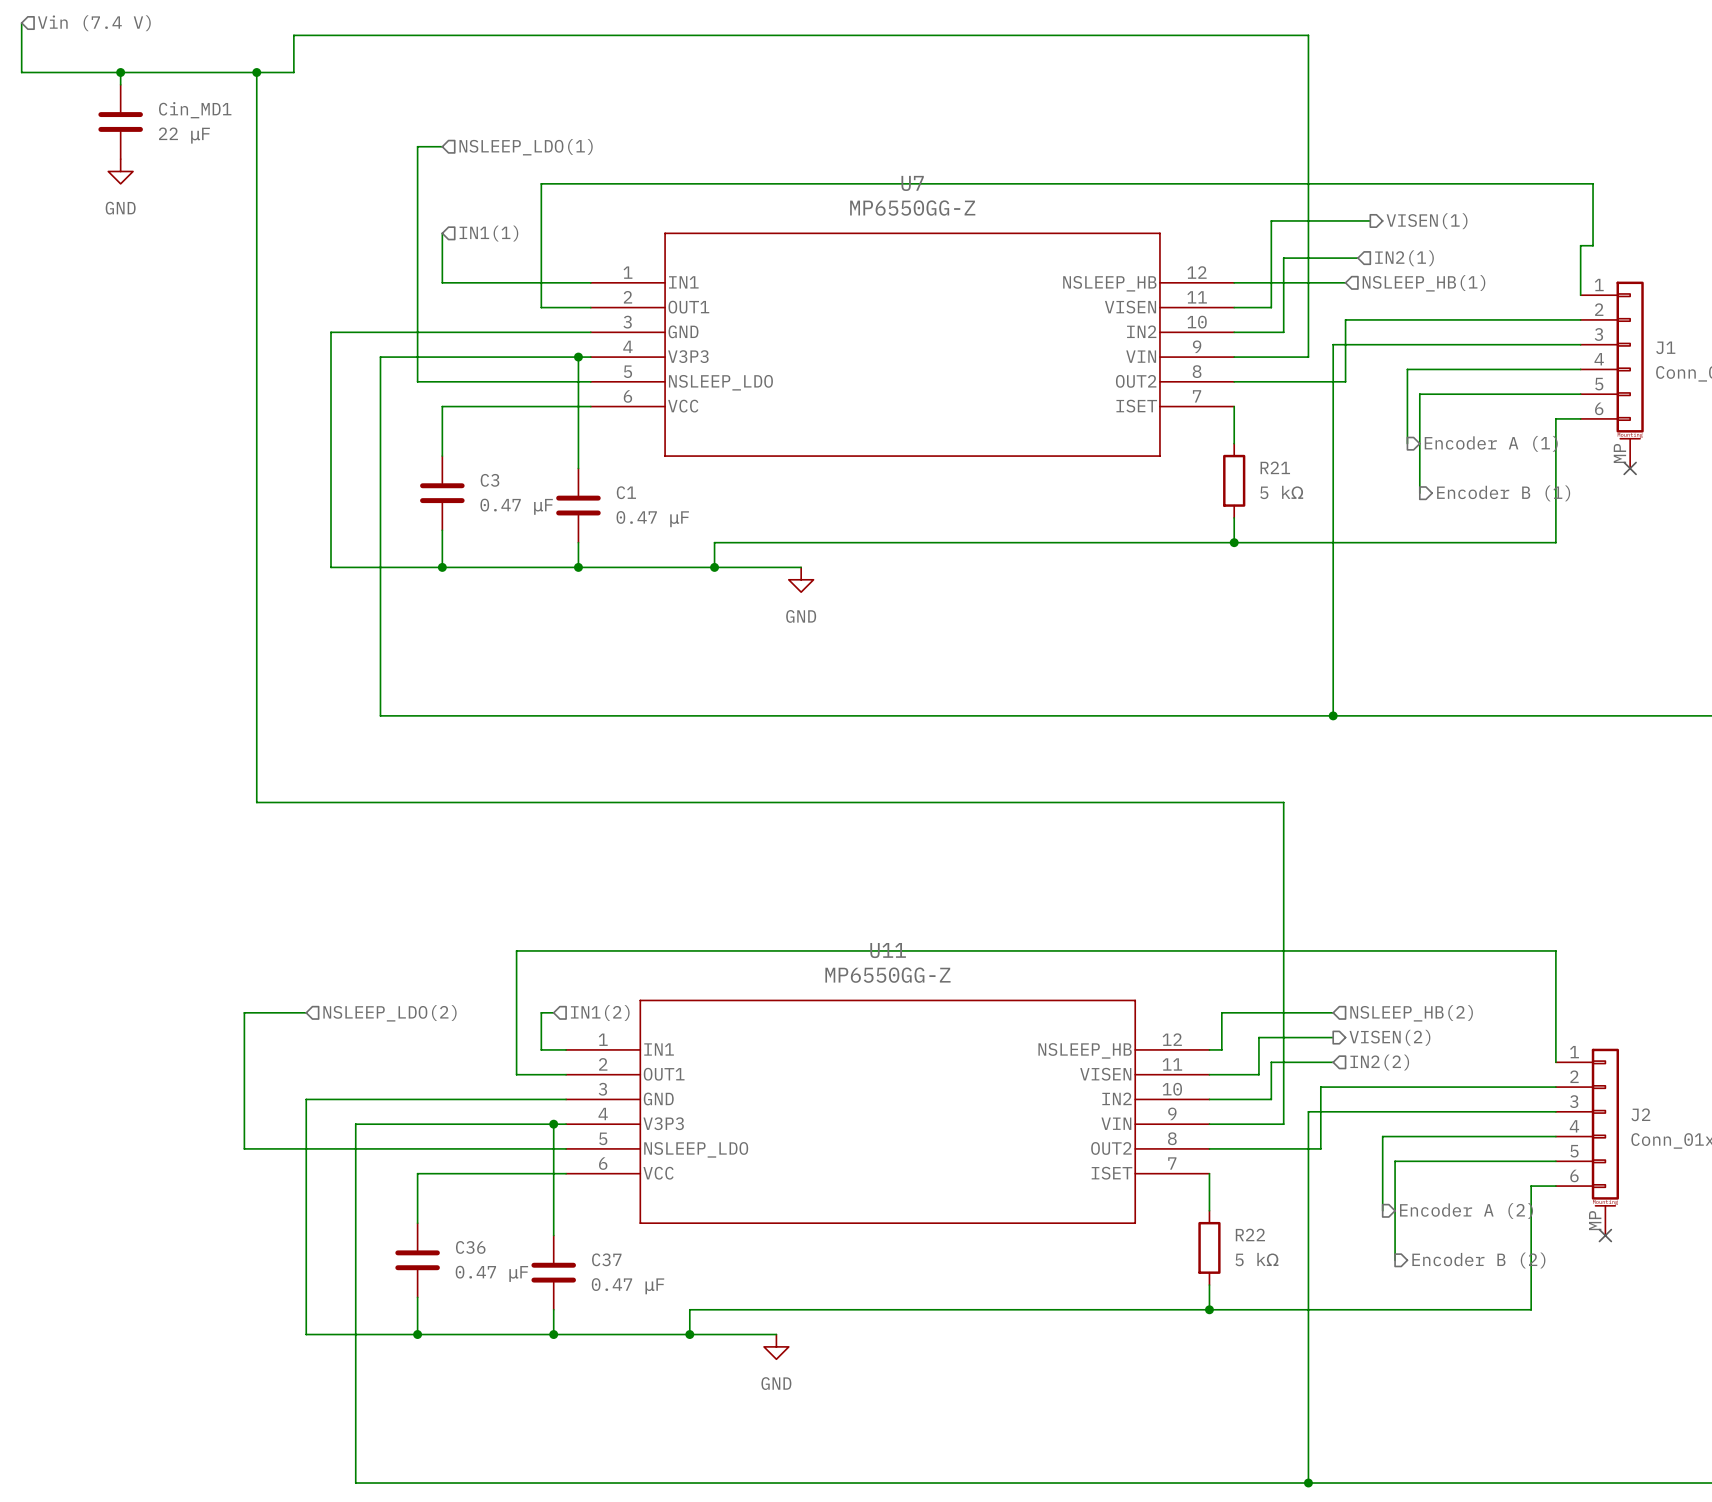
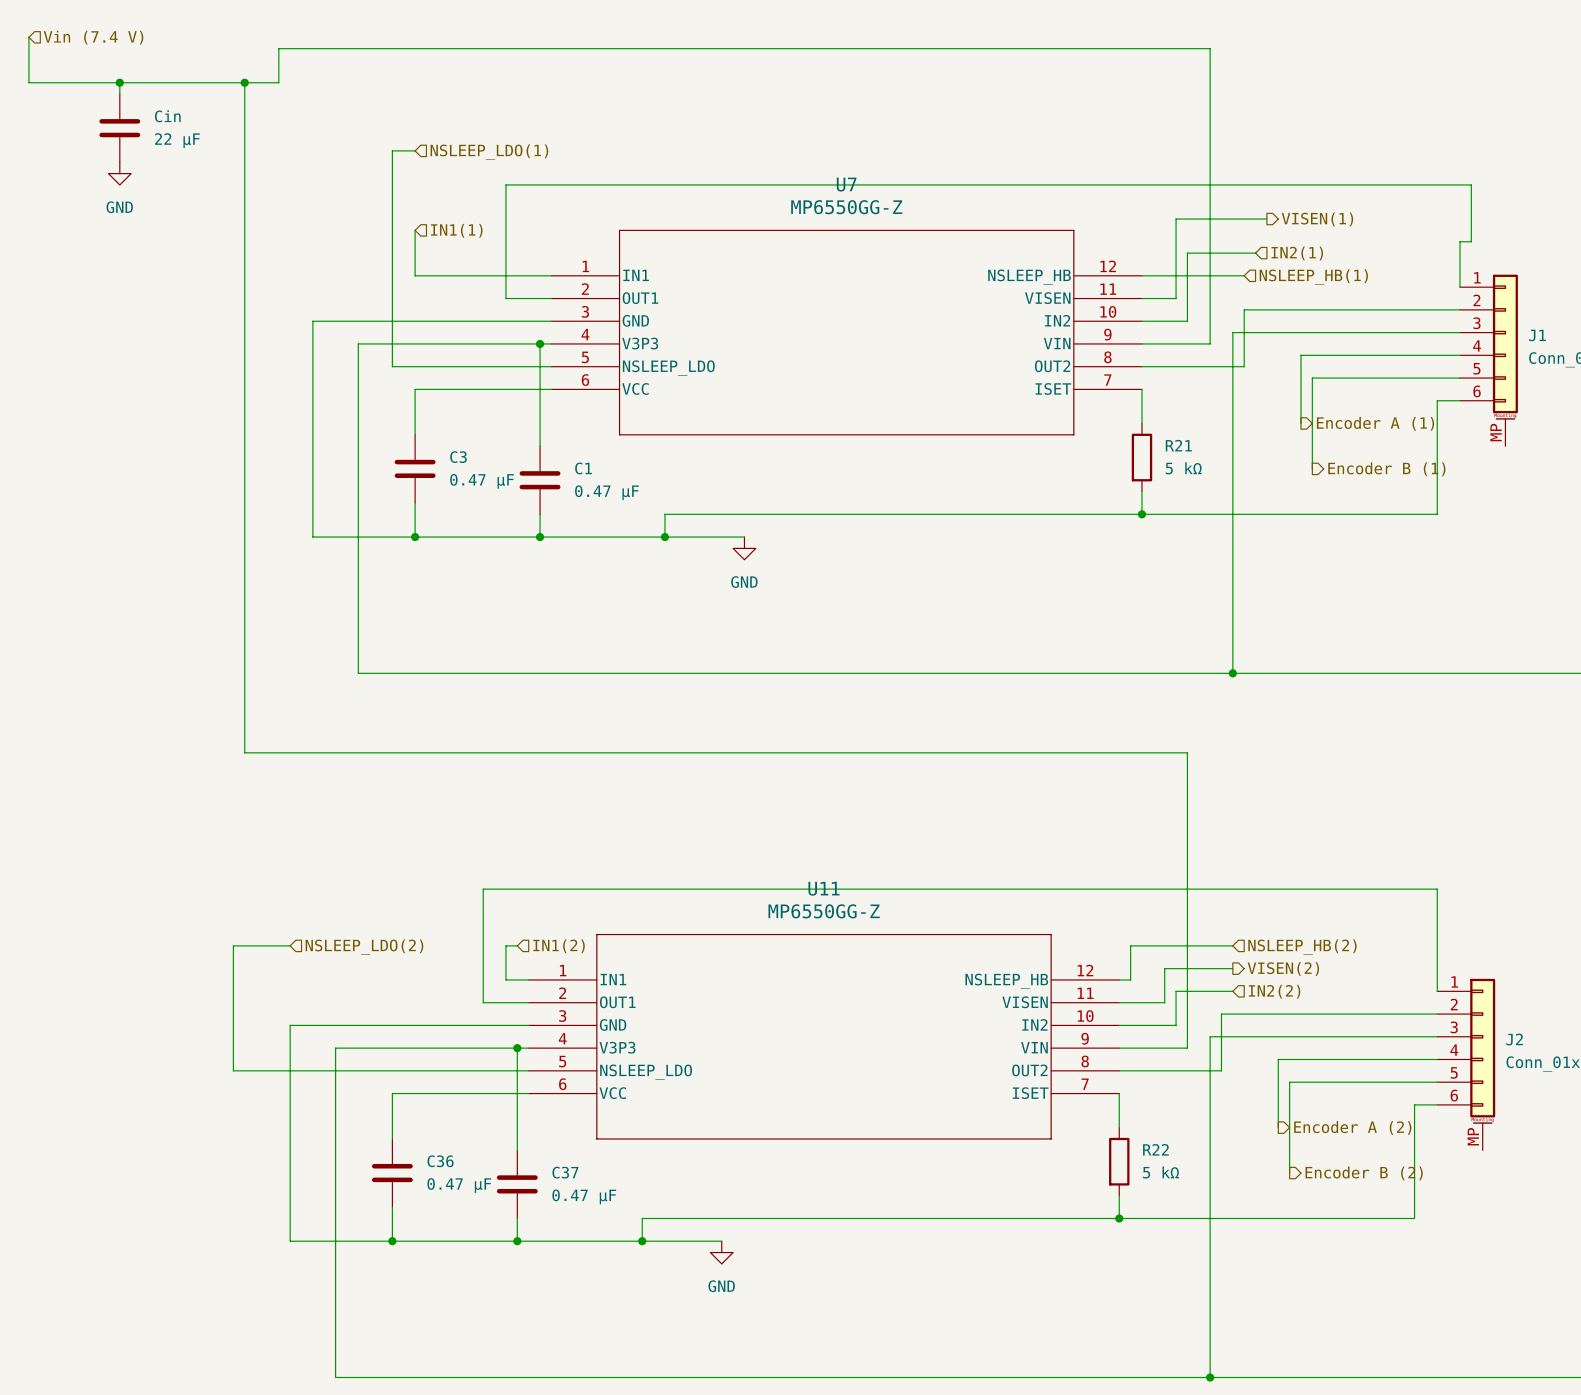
Cin_MD1 name: Cin_MD1 (195, 110) -> Cin (167, 116)
no-connect mark: (1630, 468) -> none
no-connect mark: (1605, 1235) -> none

